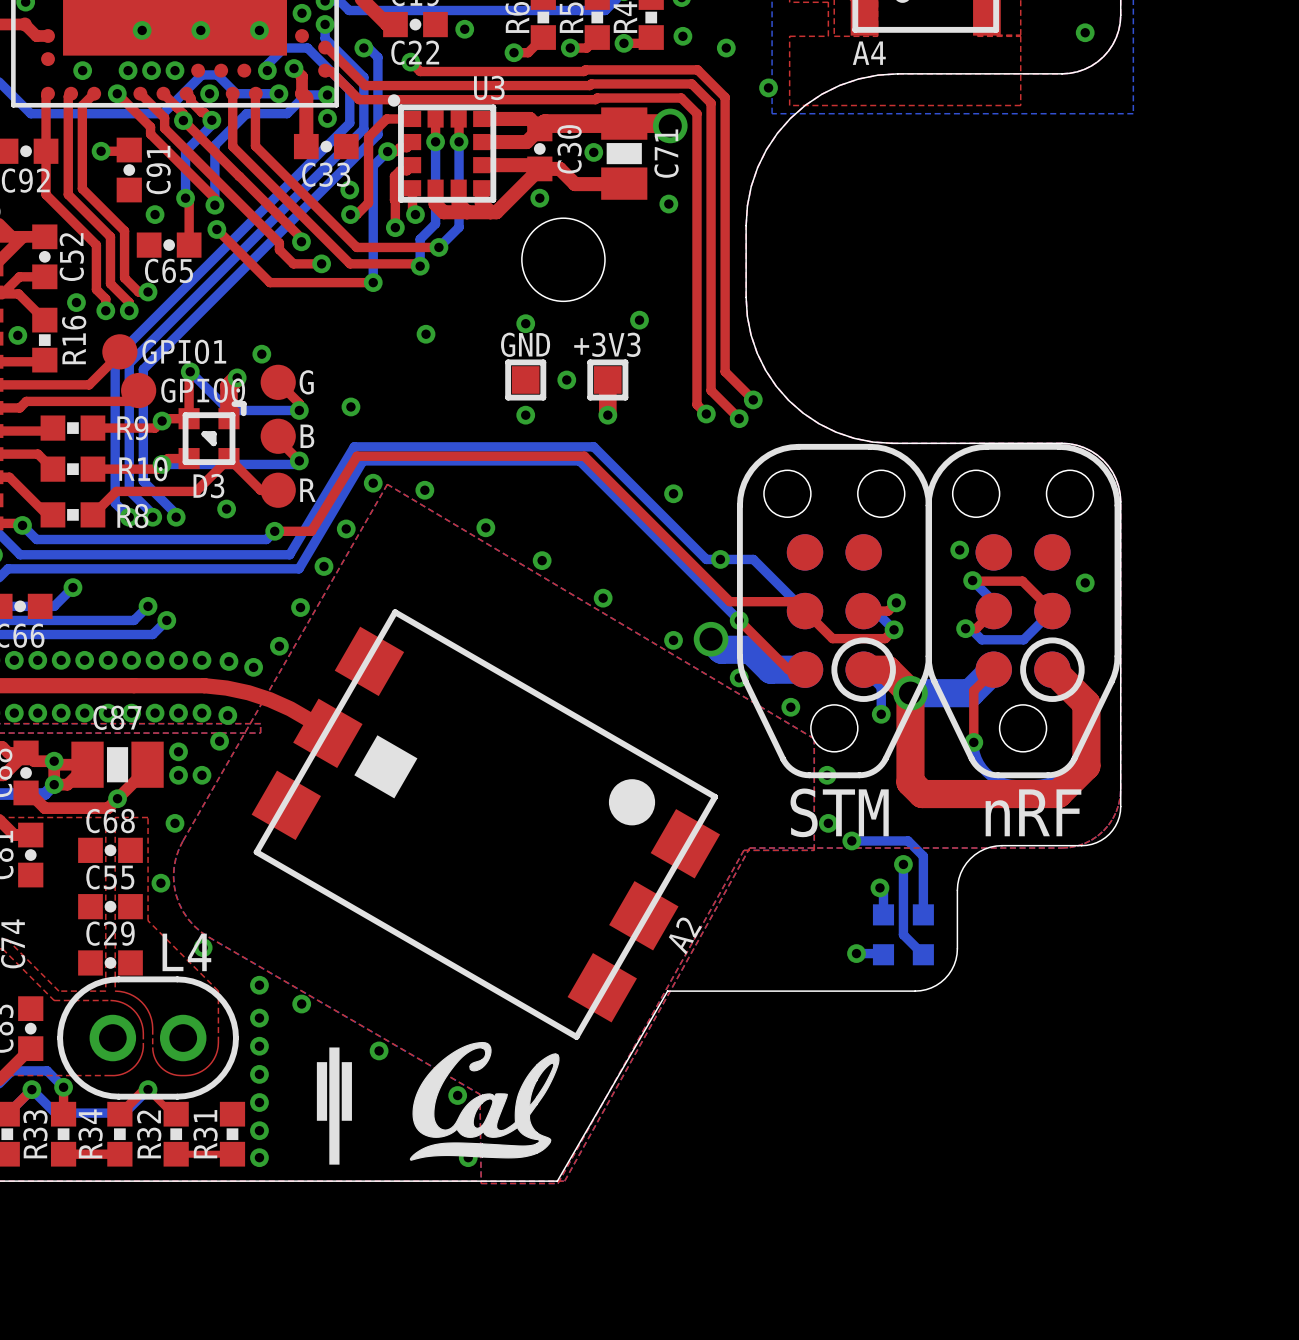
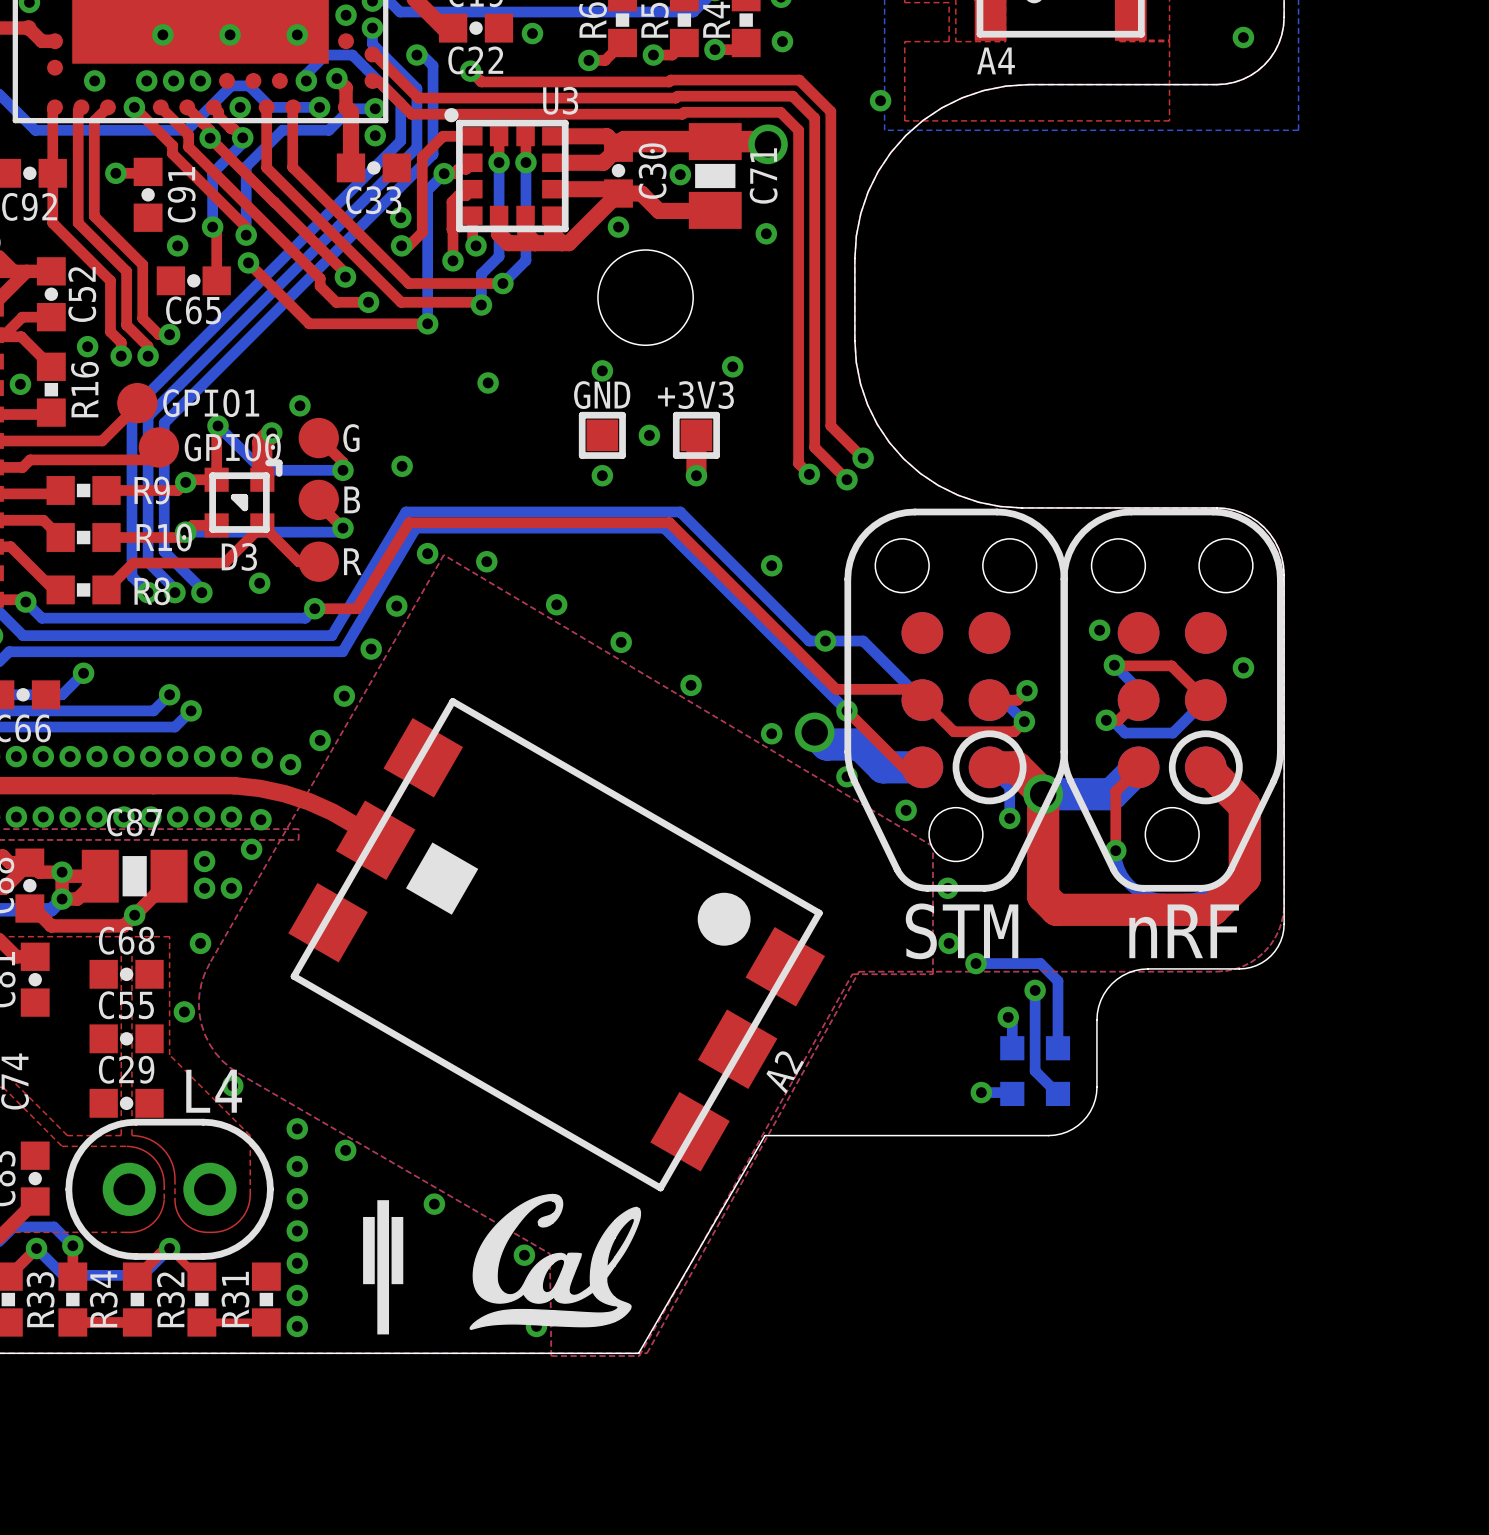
via: (726, 48) -> none

